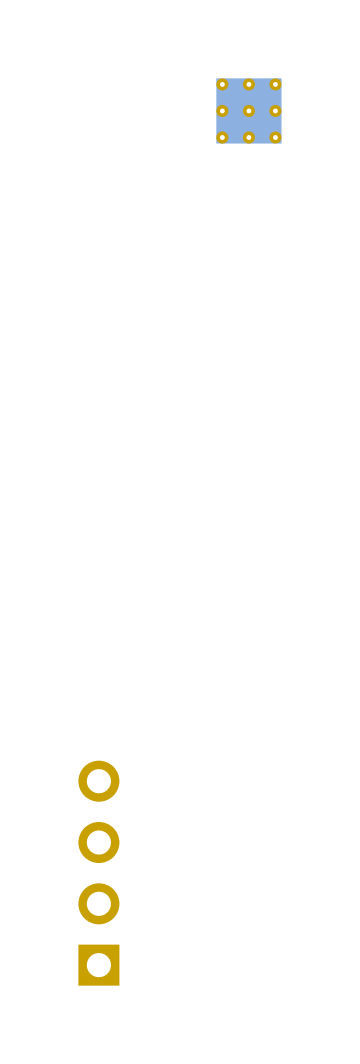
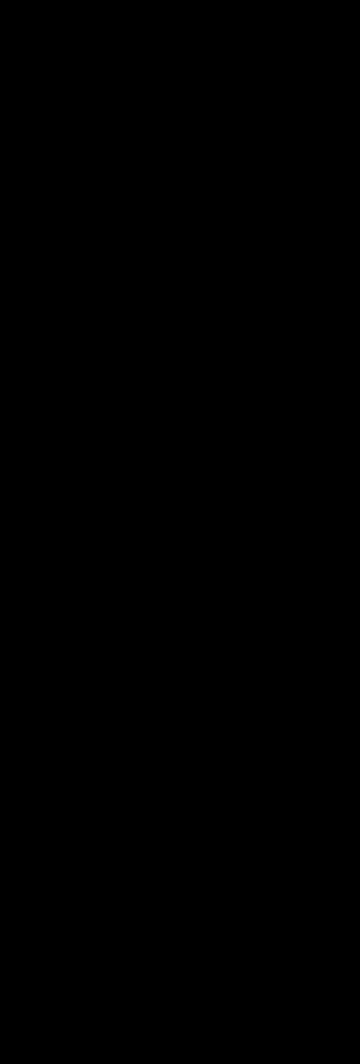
part: (248, 110) -> none
part: (98, 873) -> none

